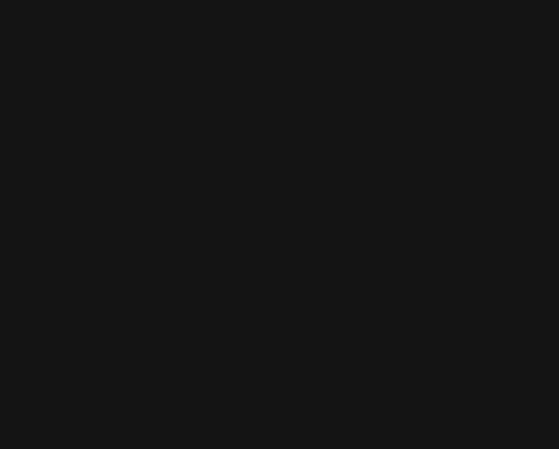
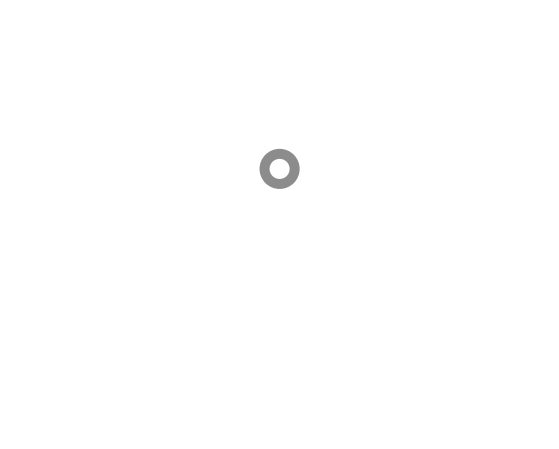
via: none -> (279, 168)

